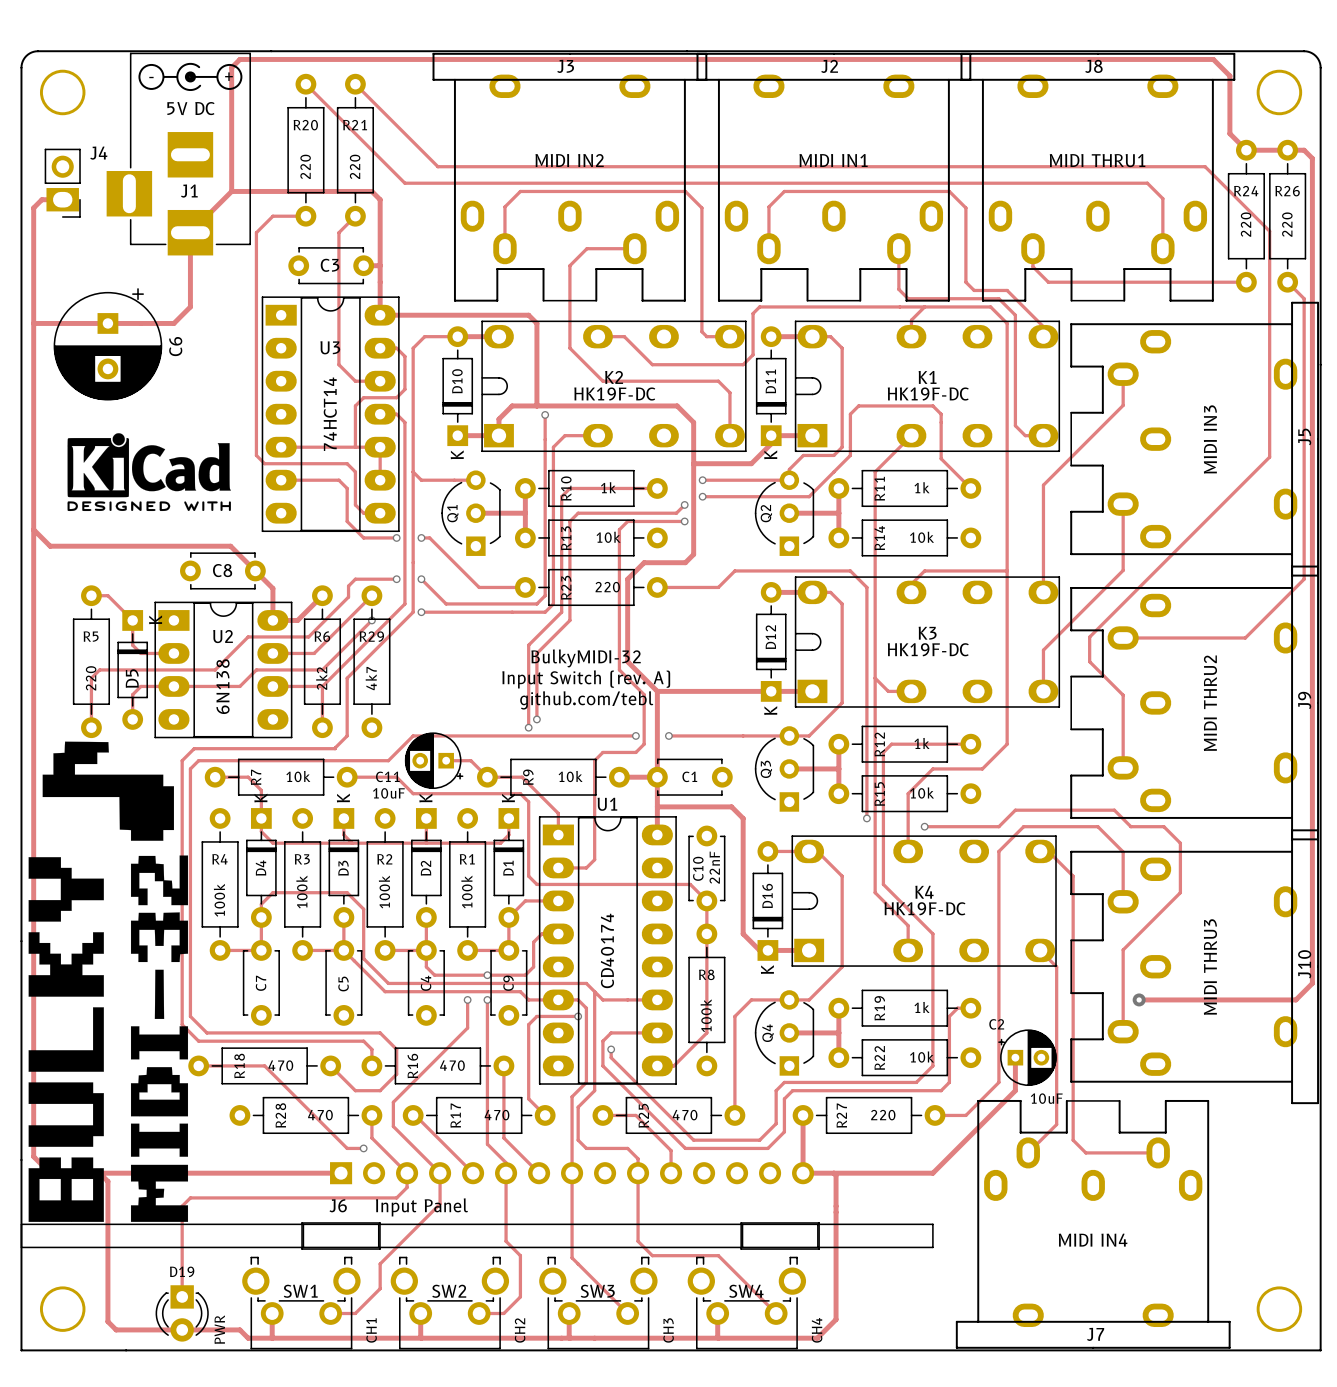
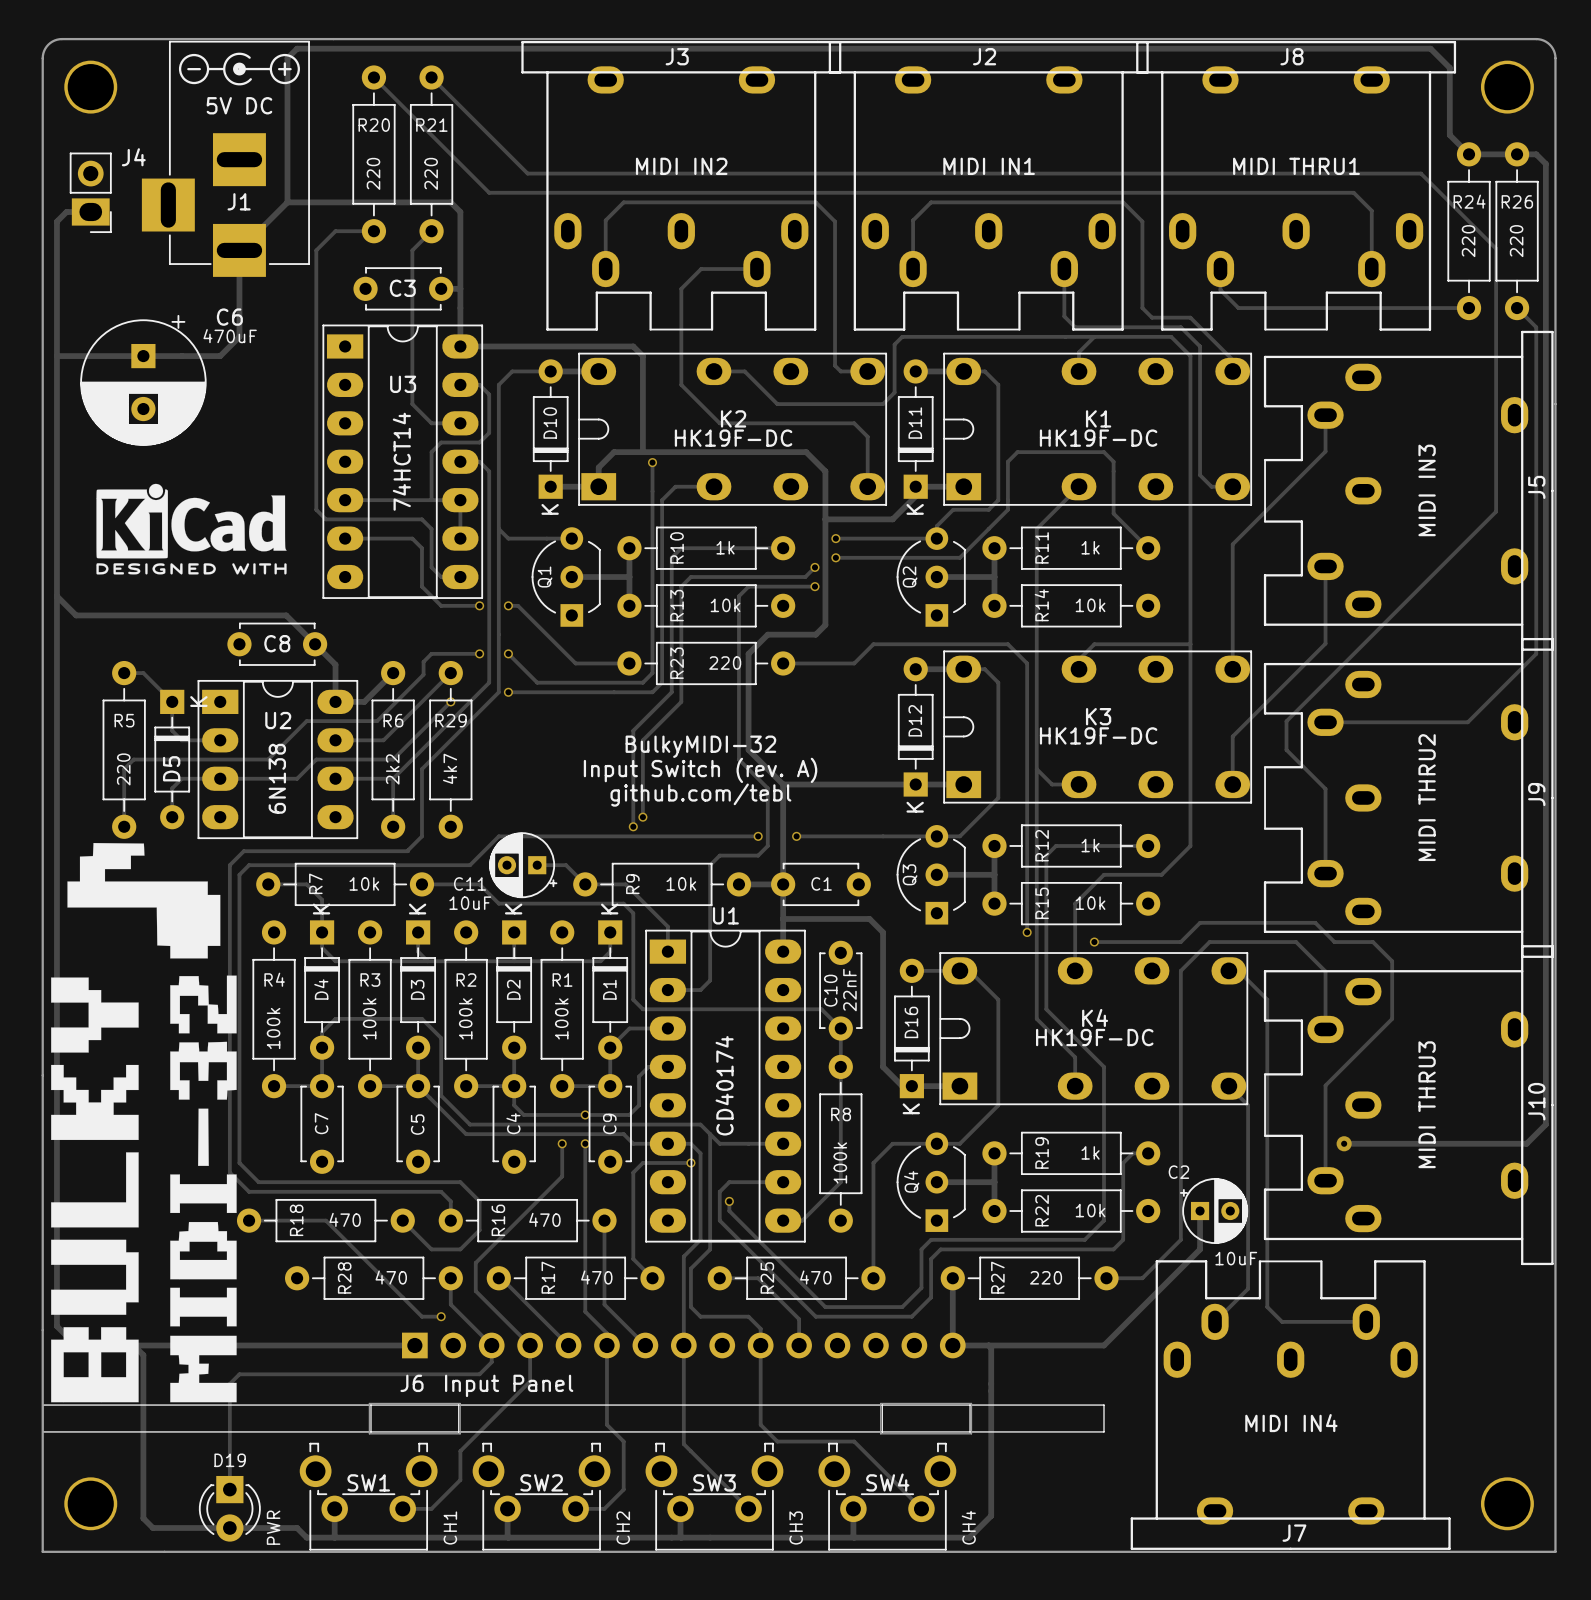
C6 value: none -> 470uF (230, 336)
C6 name rotation: 0° (175, 346) -> 90° clockwise (229, 317)
C6 name position: C6 (175, 346) -> C6 (229, 317)

